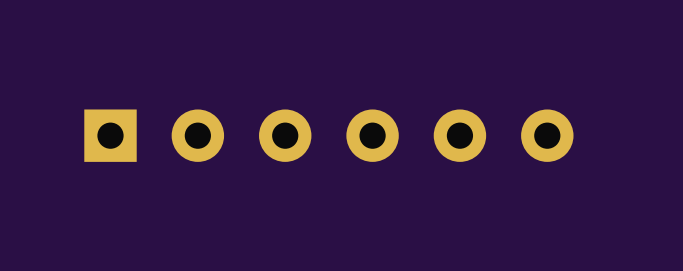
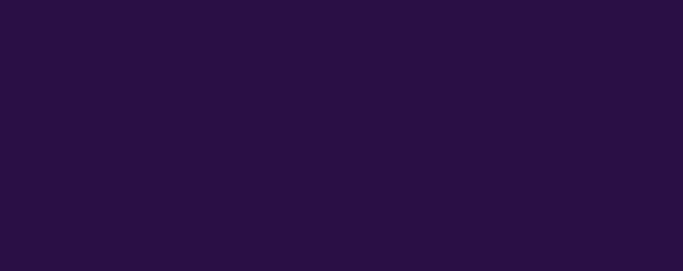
part: (328, 135) -> none

